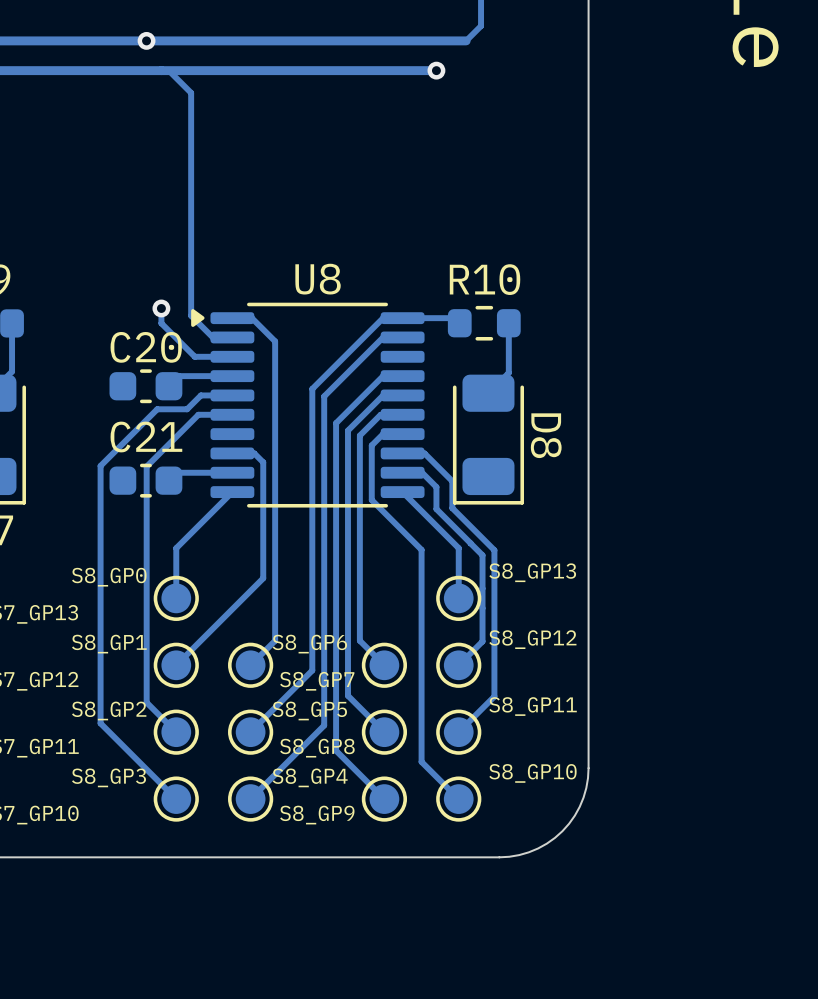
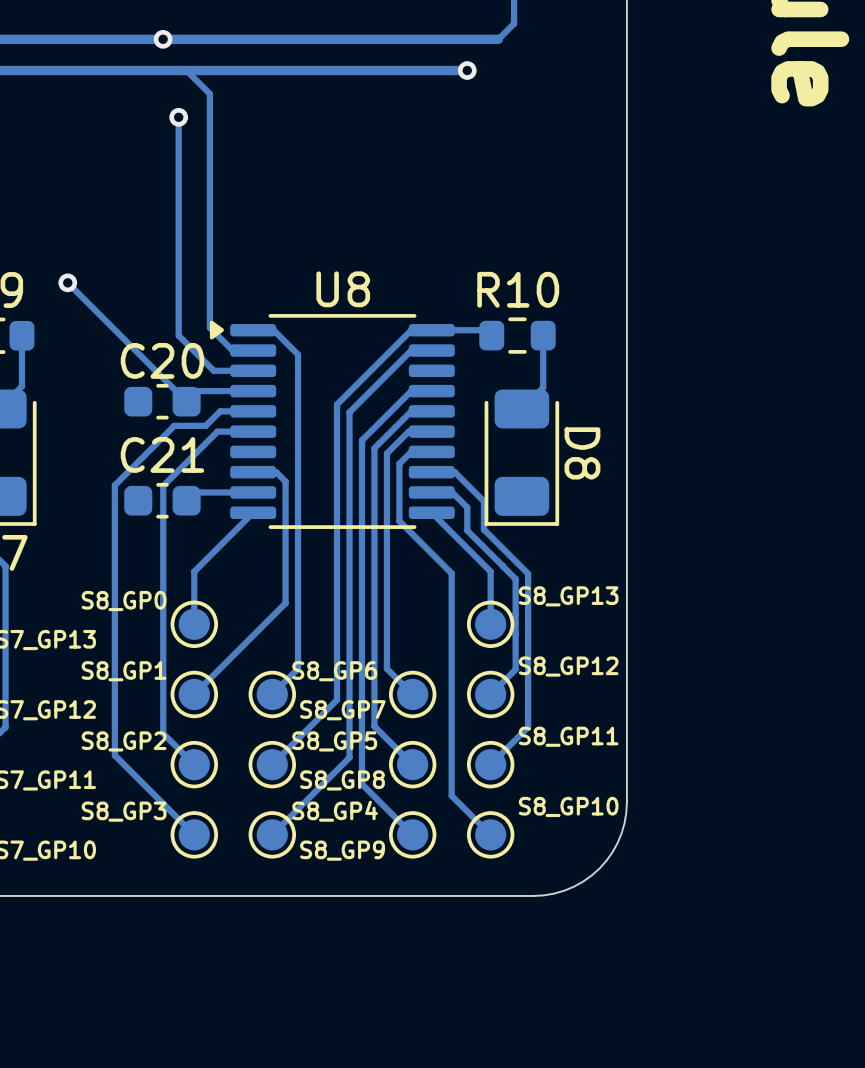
track: none -> (178, 117) (178, 320)
via: none -> (178, 117)
track: none -> (67, 282) (186, 401)
via: none -> (67, 282)
via: (161, 308) -> none

